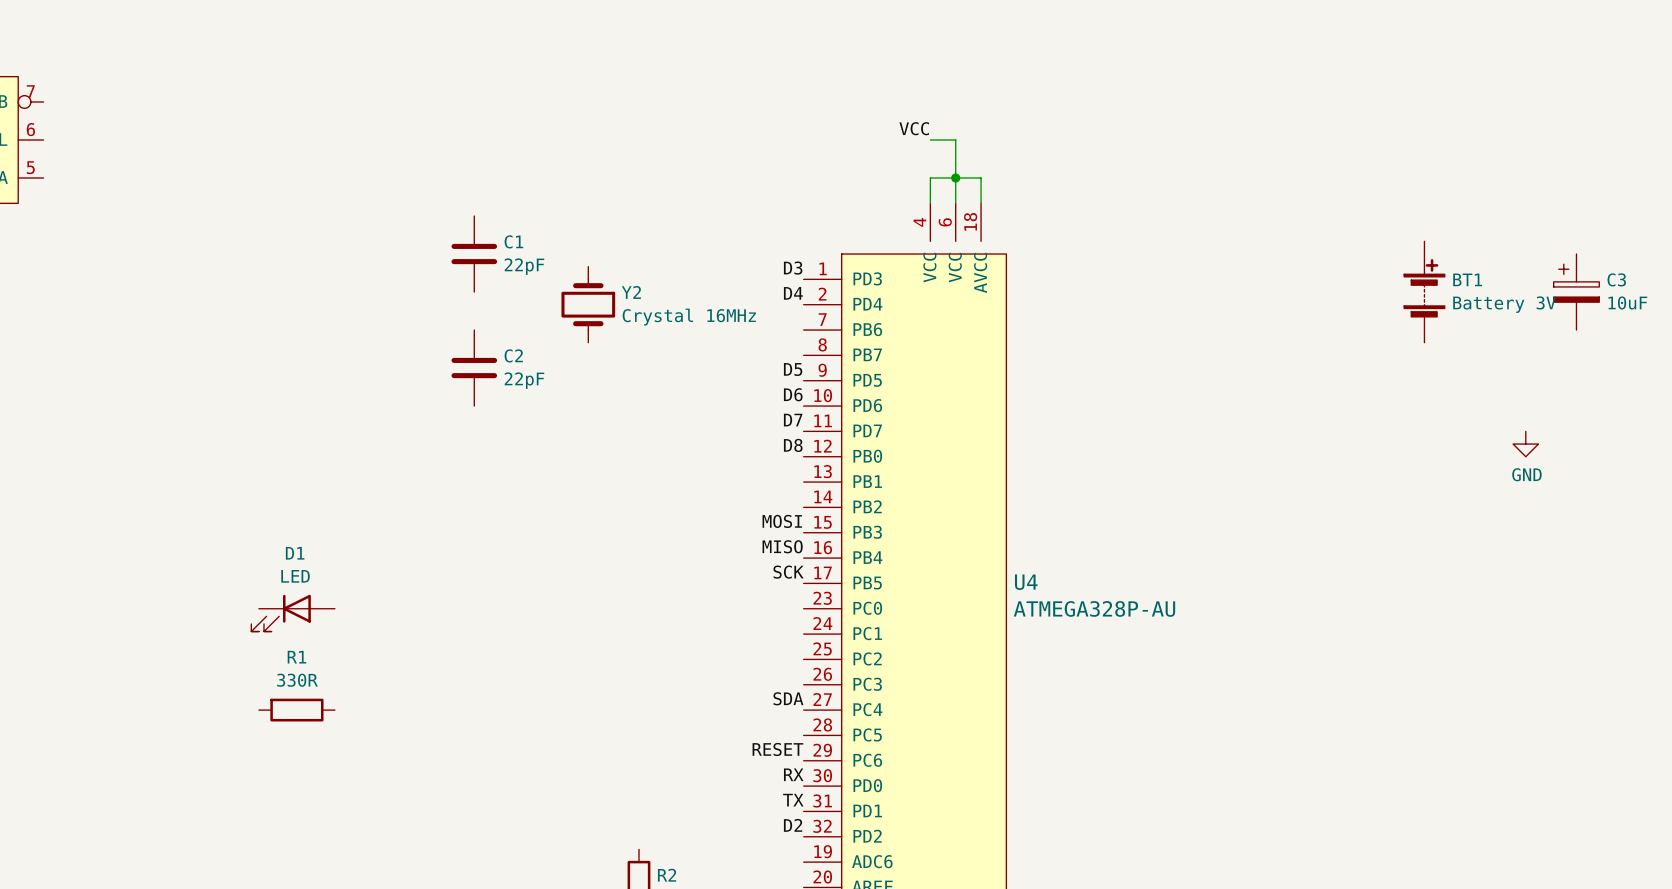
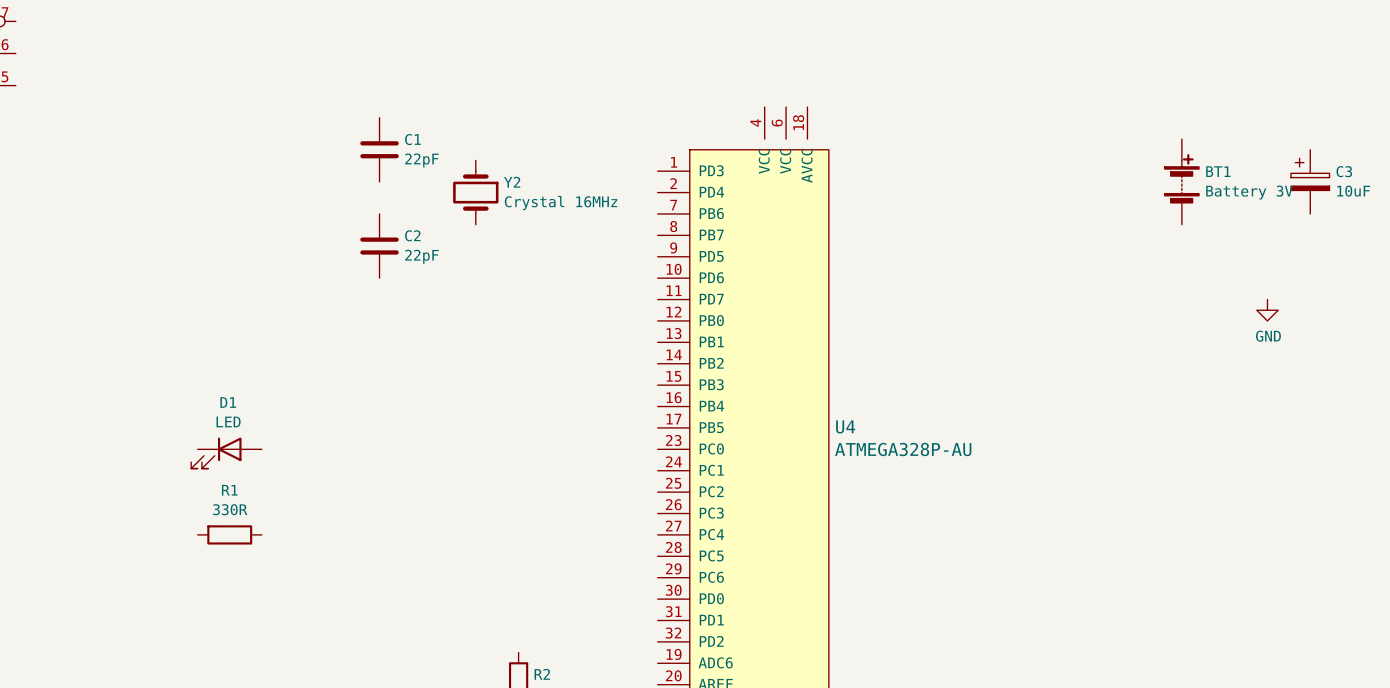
label: VCC (914, 128) -> none
wire: (930, 140) (955, 140) (955, 203) -> none
junction: (955, 178) -> none
wire: (930, 203) (930, 178) (981, 178) (981, 203) -> none
label: D3 (793, 268) -> none
label: D4 (793, 293) -> none
label: D5 (793, 369) -> none
label: D6 (793, 394) -> none
label: D7 (793, 420) -> none
label: D8 (793, 445) -> none
label: MOSI (782, 521) -> none
label: MISO (782, 546) -> none
label: SCK (788, 572) -> none
label: SDA (788, 698) -> none
label: RESET (777, 749) -> none
label: RX (793, 774) -> none
label: TX (793, 800) -> none
label: D2 (793, 825) -> none

